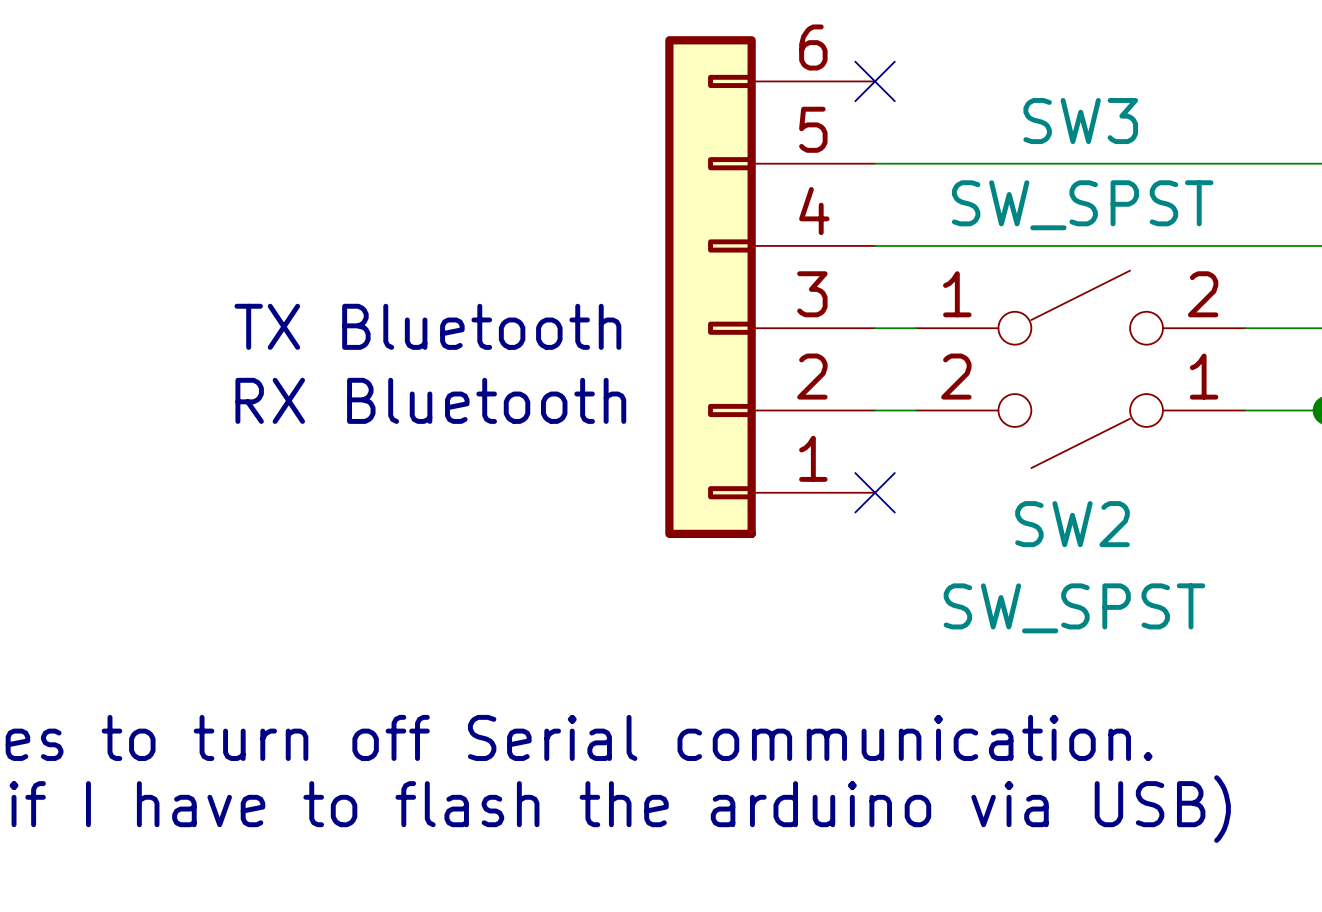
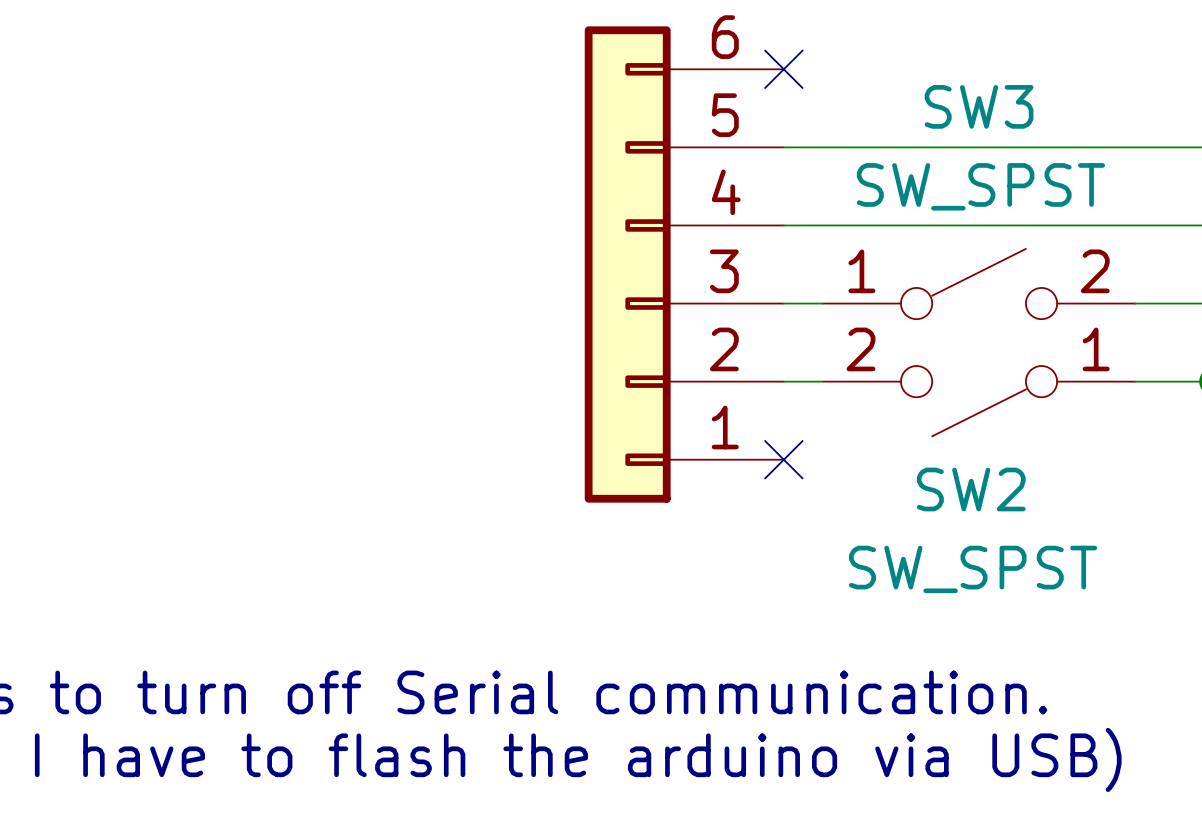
text: TX Bluetooth (427, 326) -> none
text: RX Bluetooth (430, 400) -> none

